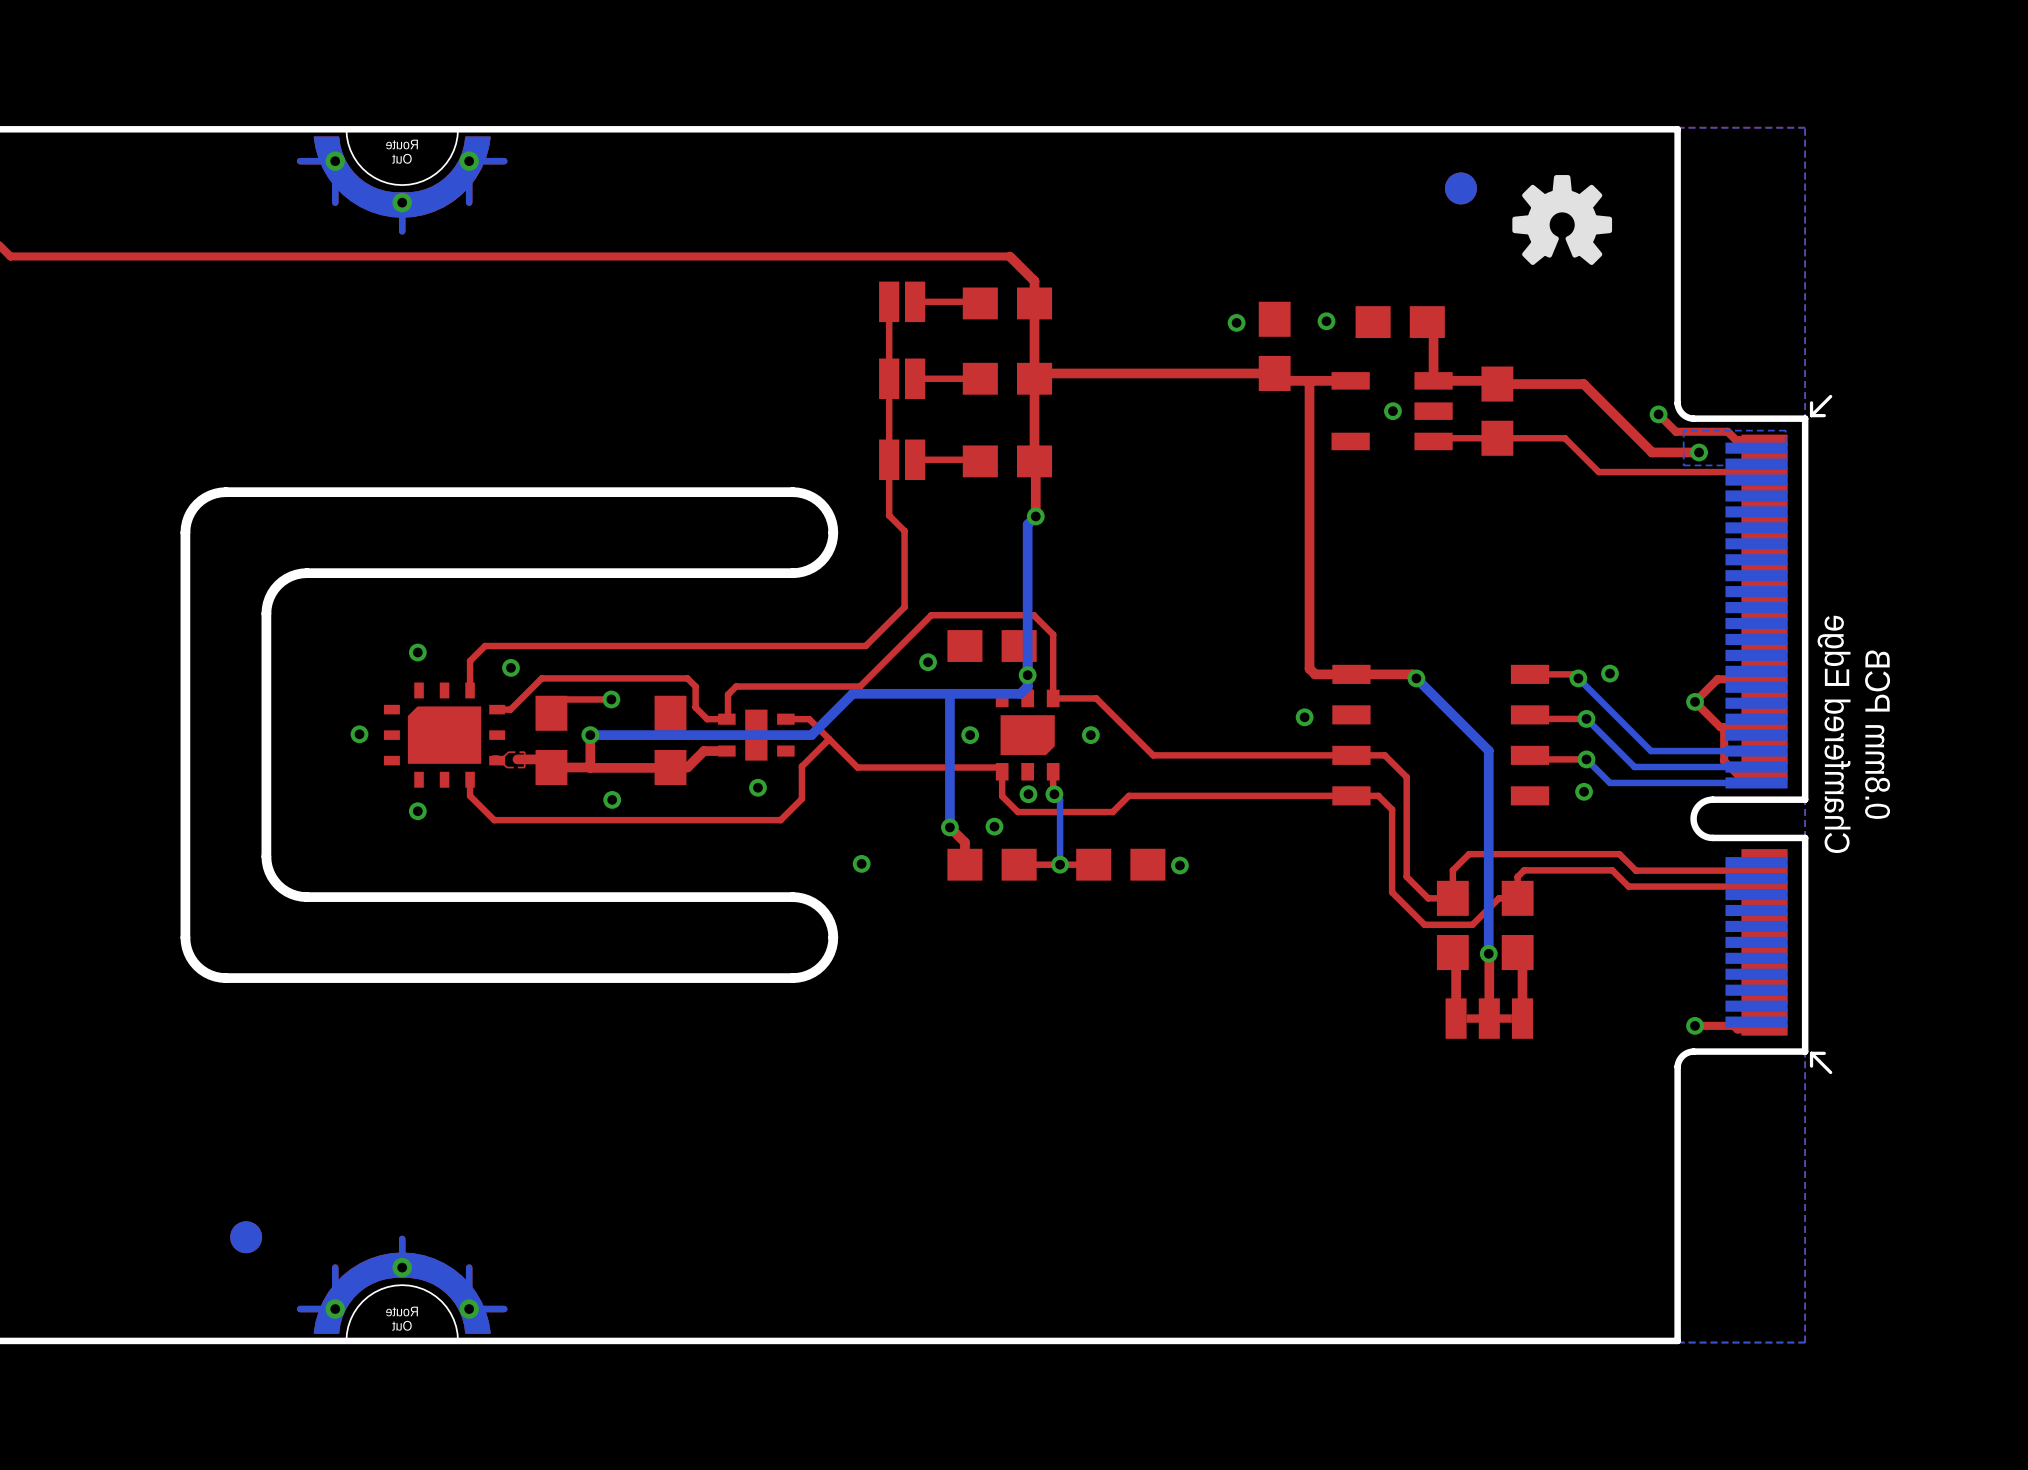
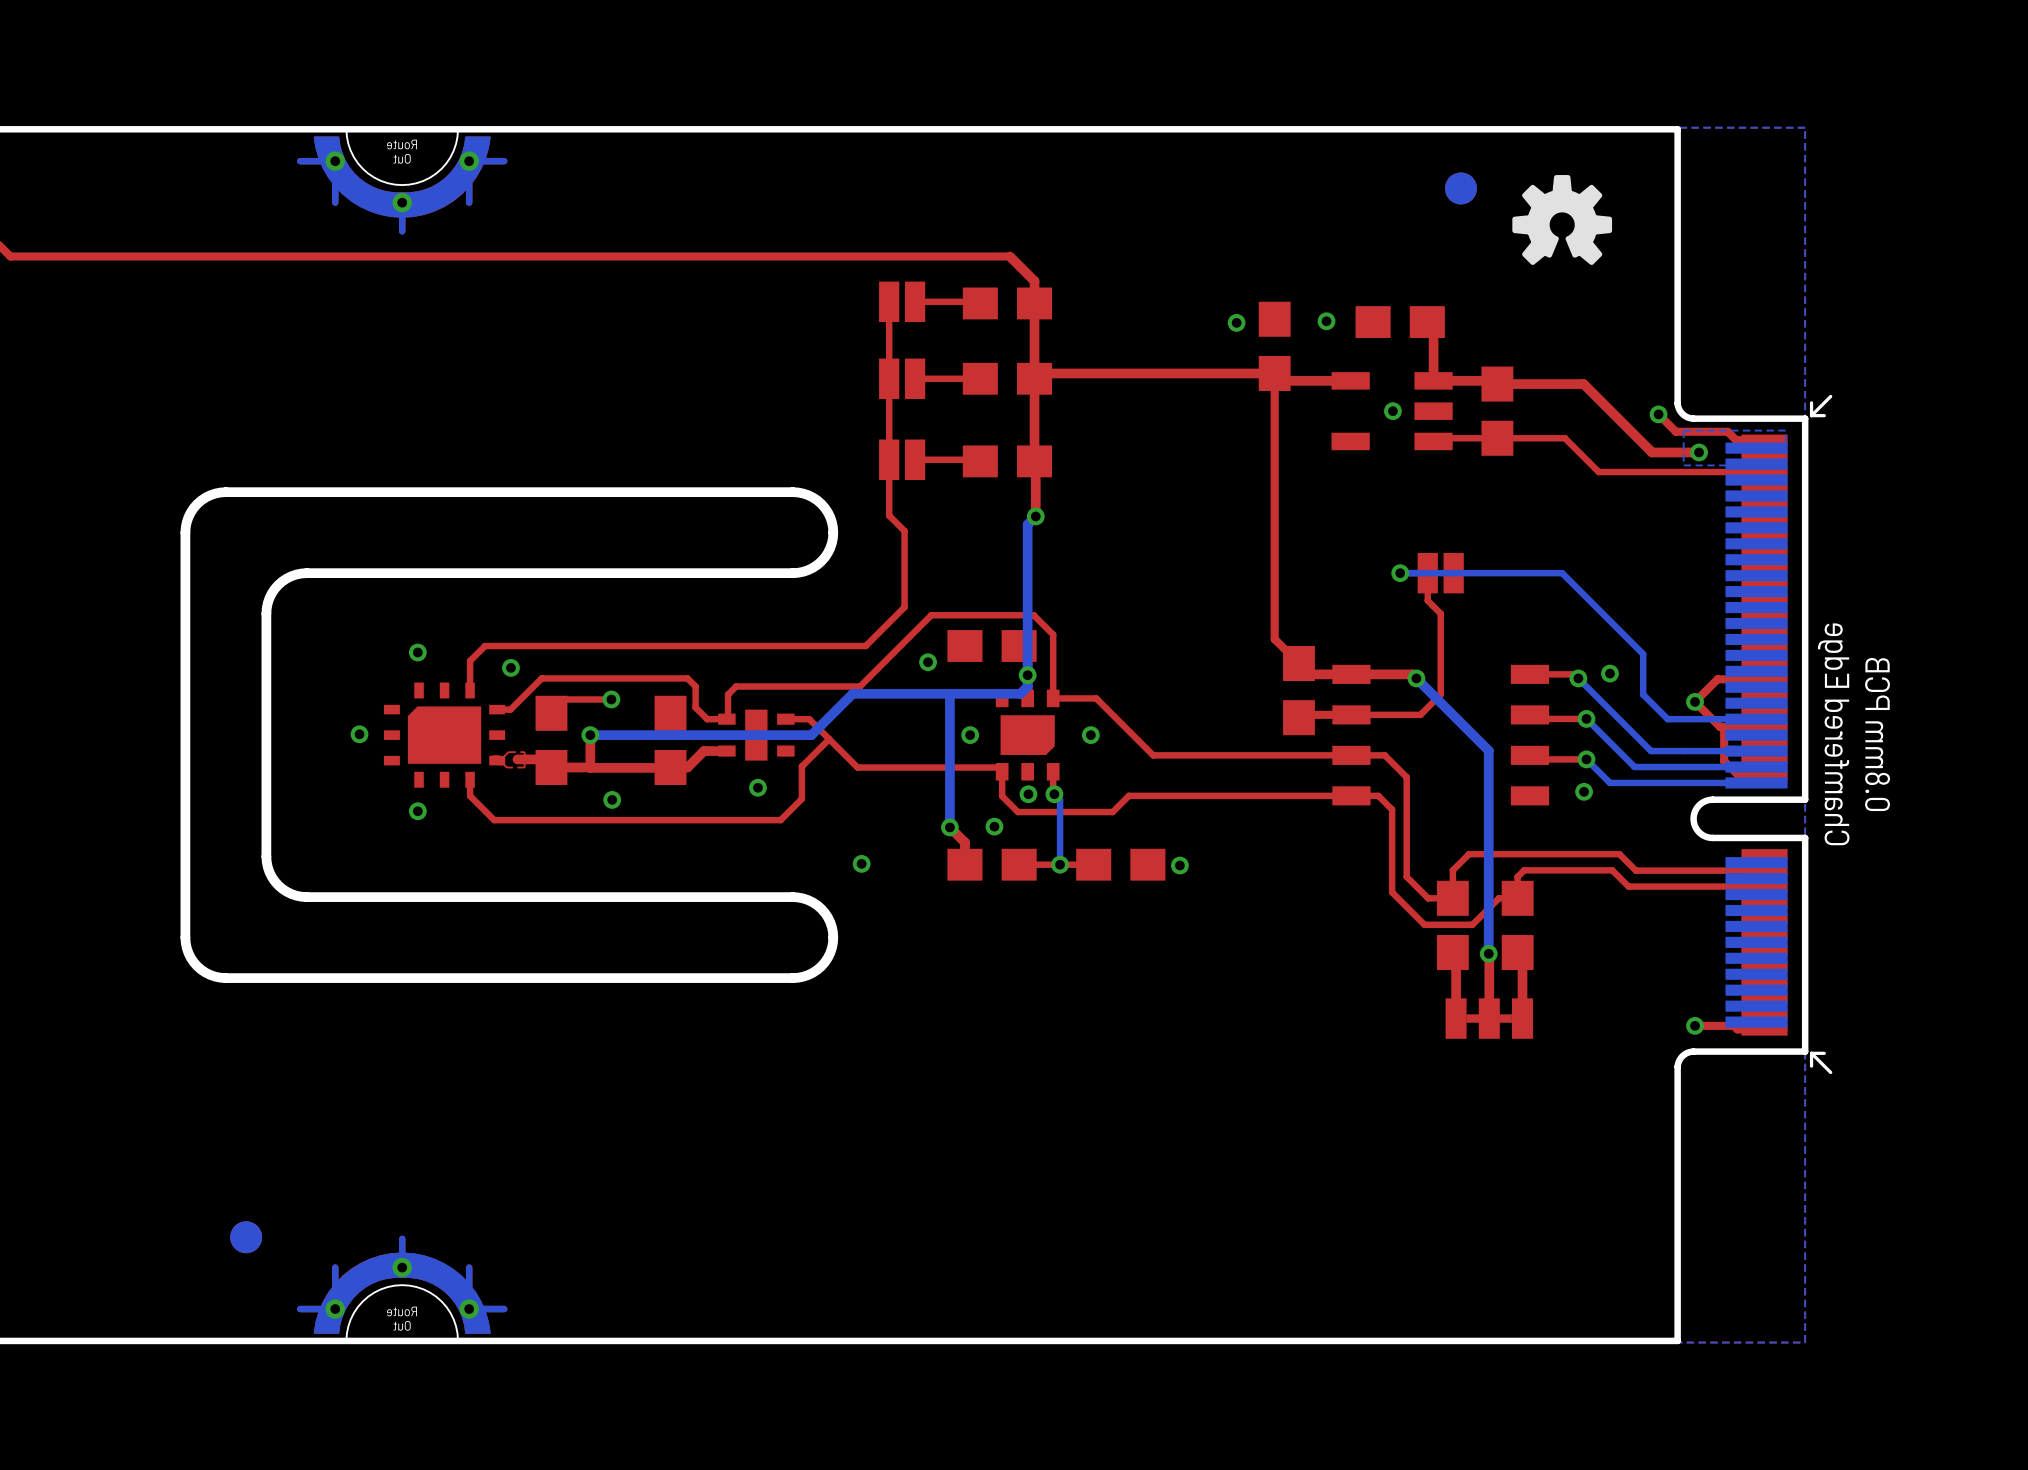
top track: (1309, 380) (1309, 668) (1315, 674) -> (1274, 373) (1274, 639) (1309, 674) (1315, 674)
top track: none -> (1400, 573) (1427, 573) (1427, 600) (1440, 613) (1440, 694) (1420, 714) (1301, 714) (1298, 717)
bottom track: none -> (1400, 573) (1562, 573) (1643, 654) (1643, 694) (1667, 719) (1756, 719)
part: none -> (1440, 573)
part: none -> (1298, 690)
via position: (1304, 717) -> (1400, 573)

